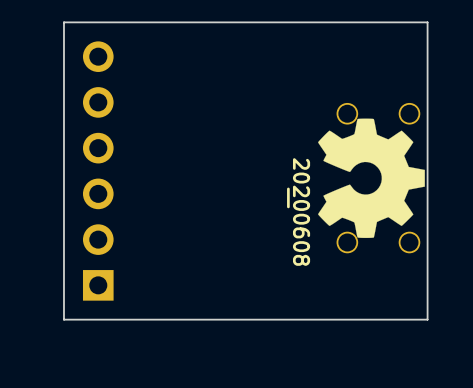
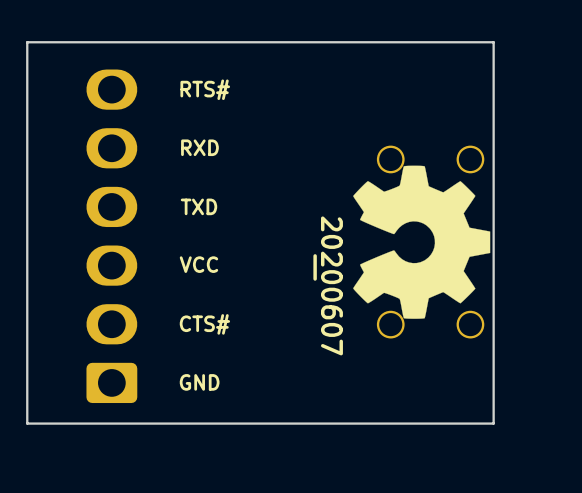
drawing shape: [287, 158, 311, 266] -> [313, 216, 343, 356]
part: (98, 171) -> none
part: none -> (111, 236)

